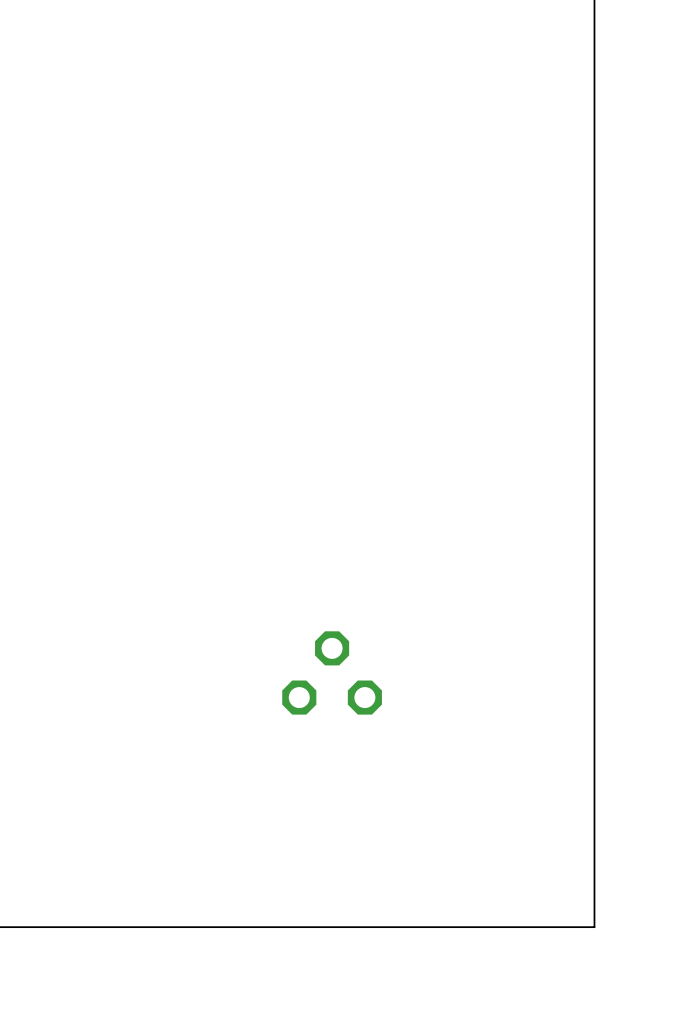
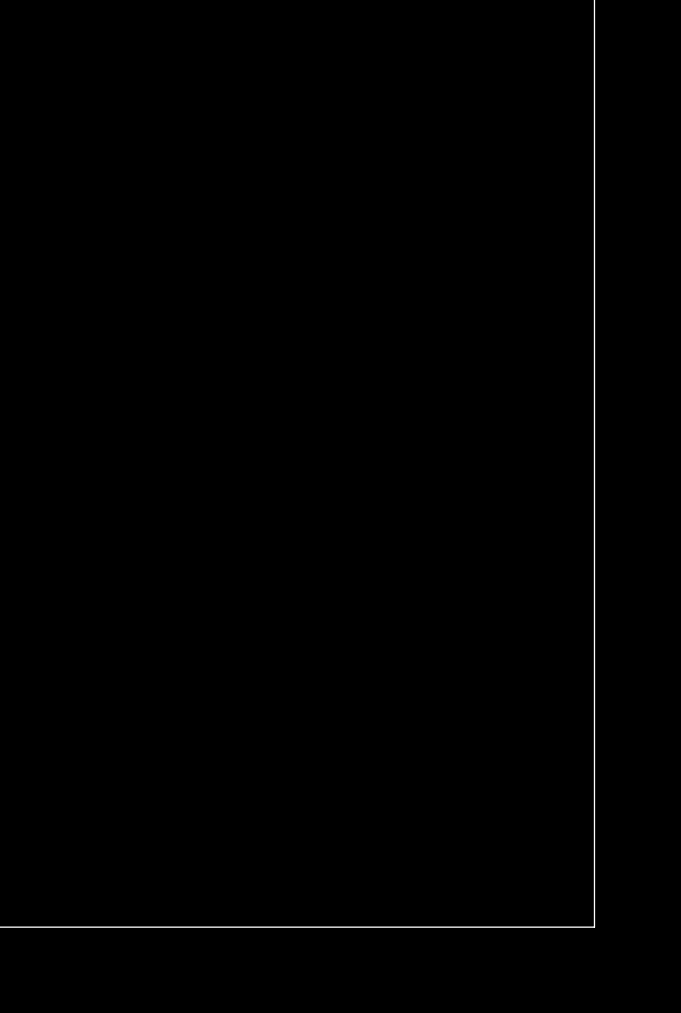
part: (332, 672) -> none

